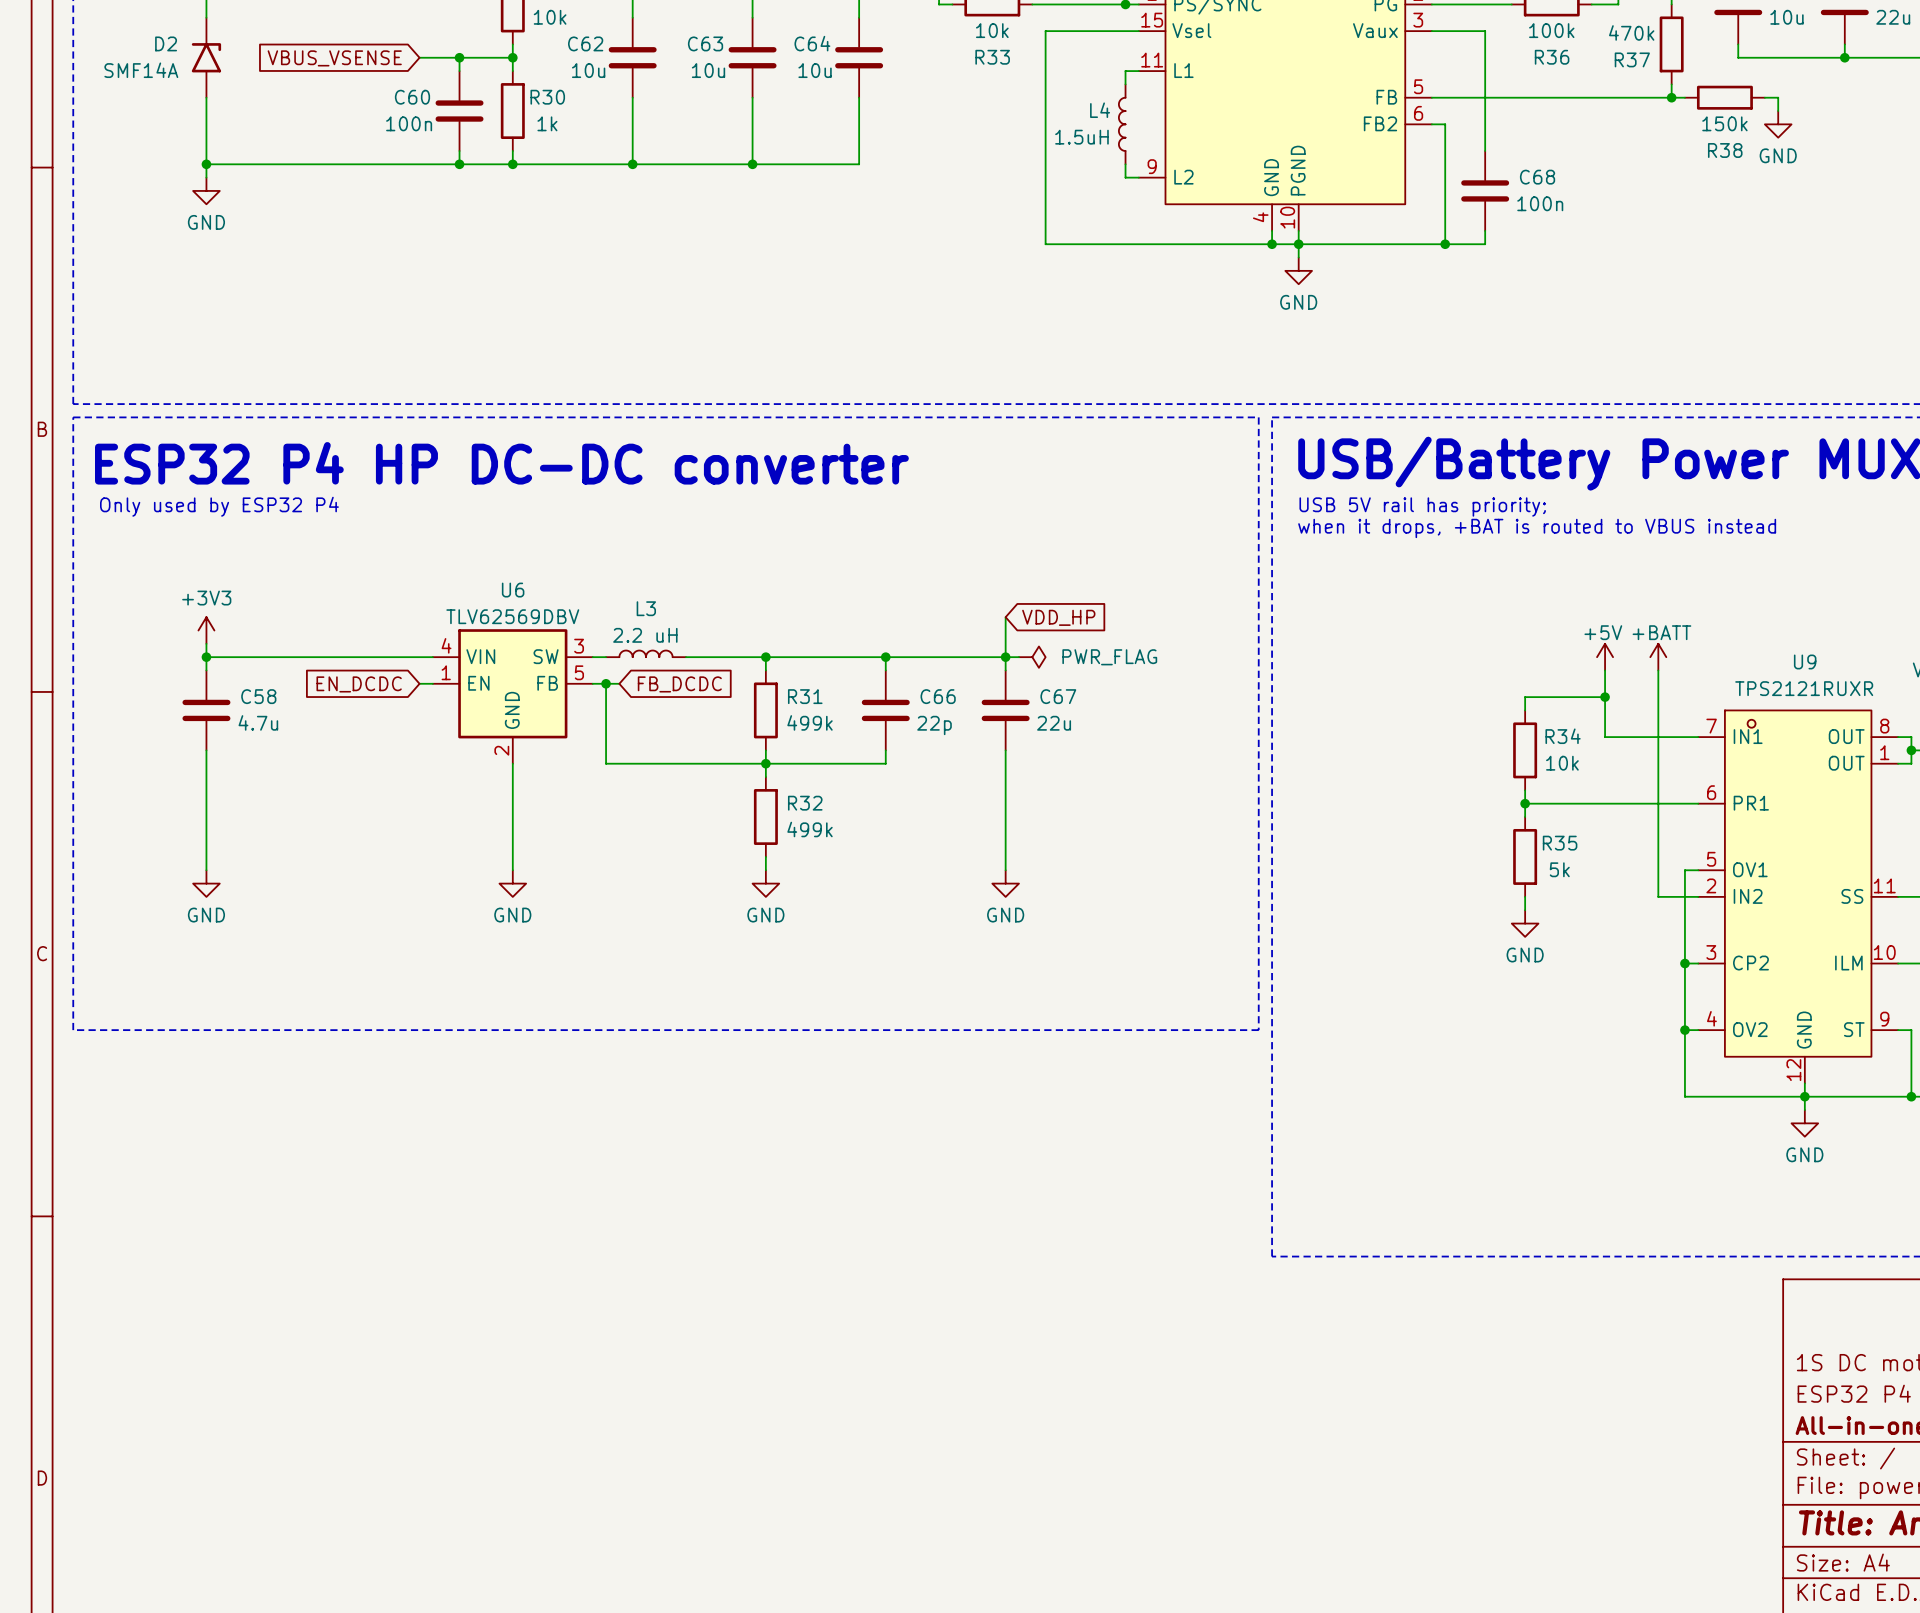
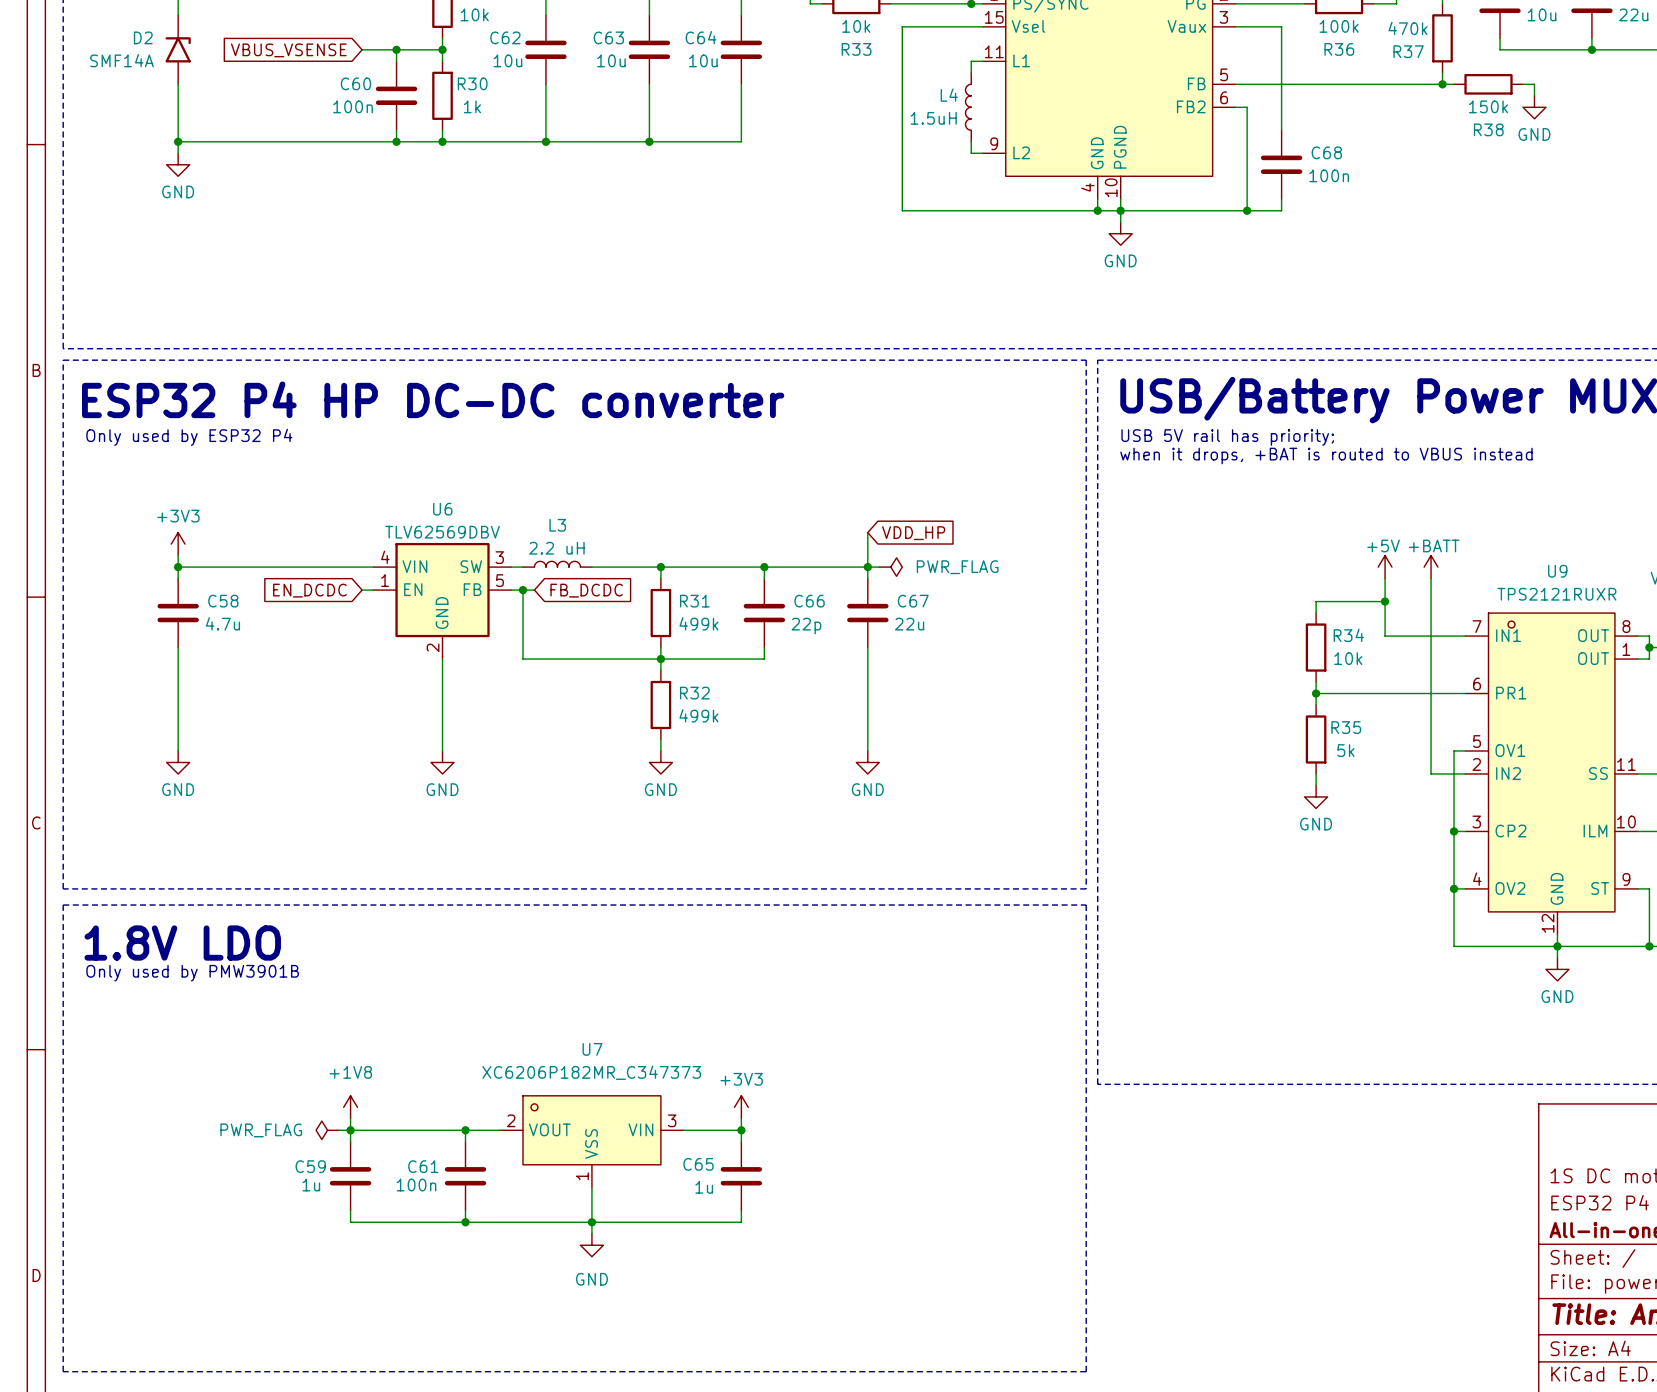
line: none -> (63, 905) (1086, 905) (1086, 1371) (63, 1371) (63, 905)
text: none -> 1.8V LDO (182, 943)
text: none -> Only used by PMW3901B (192, 973)
power symbol: none -> +1V8 (350, 1107)
power symbol: none -> +3V3 (741, 1107)
wire: none -> (350, 1118) (350, 1141)
wire: none -> (741, 1118) (741, 1141)
power symbol: none -> PWR_FLAG (327, 1130)
wire: none -> (339, 1130) (499, 1130)
junction: none -> (350, 1130)
wire: none -> (465, 1130) (465, 1141)
junction: none -> (465, 1130)
wire: none -> (683, 1130) (741, 1130)
junction: none -> (741, 1130)
U7: none -> XC6206P182MR_C347373 (591, 1141)
C59: none -> 1u (350, 1176)
C61: none -> 100n (465, 1176)
C65: none -> 1u (741, 1176)
wire: none -> (591, 1187) (591, 1233)
wire: none -> (350, 1210) (350, 1222) (741, 1222) (741, 1210)
wire: none -> (465, 1210) (465, 1222)
junction: none -> (465, 1222)
junction: none -> (591, 1222)
power symbol: none -> GND (591, 1245)

